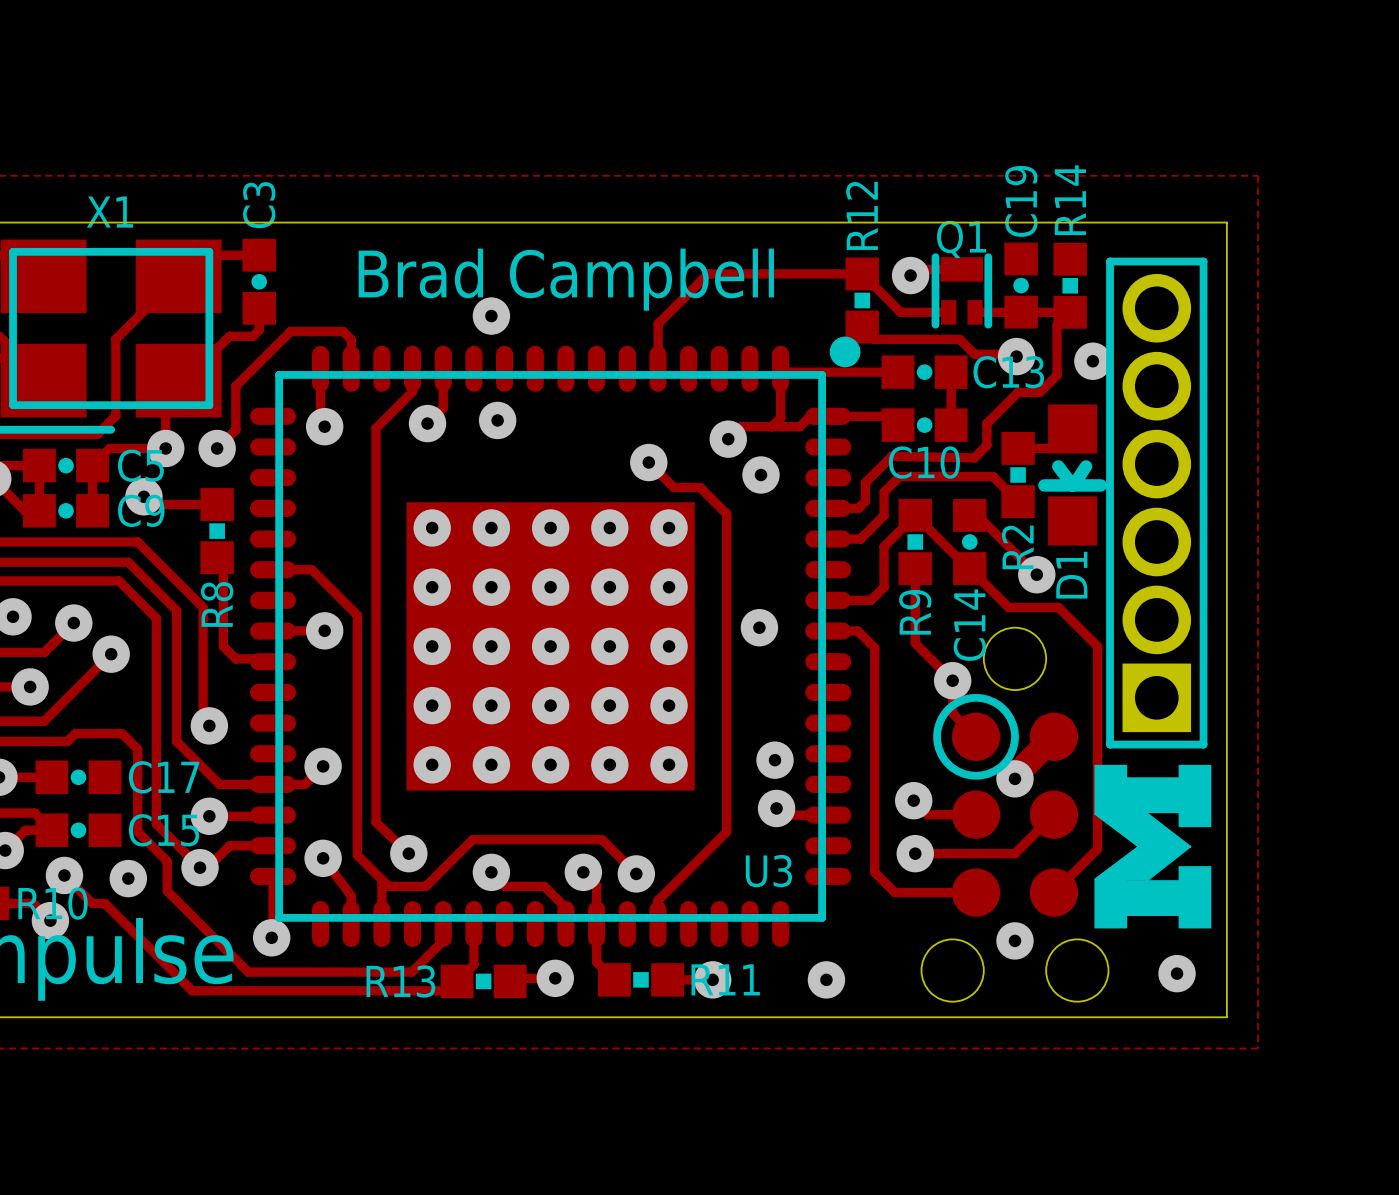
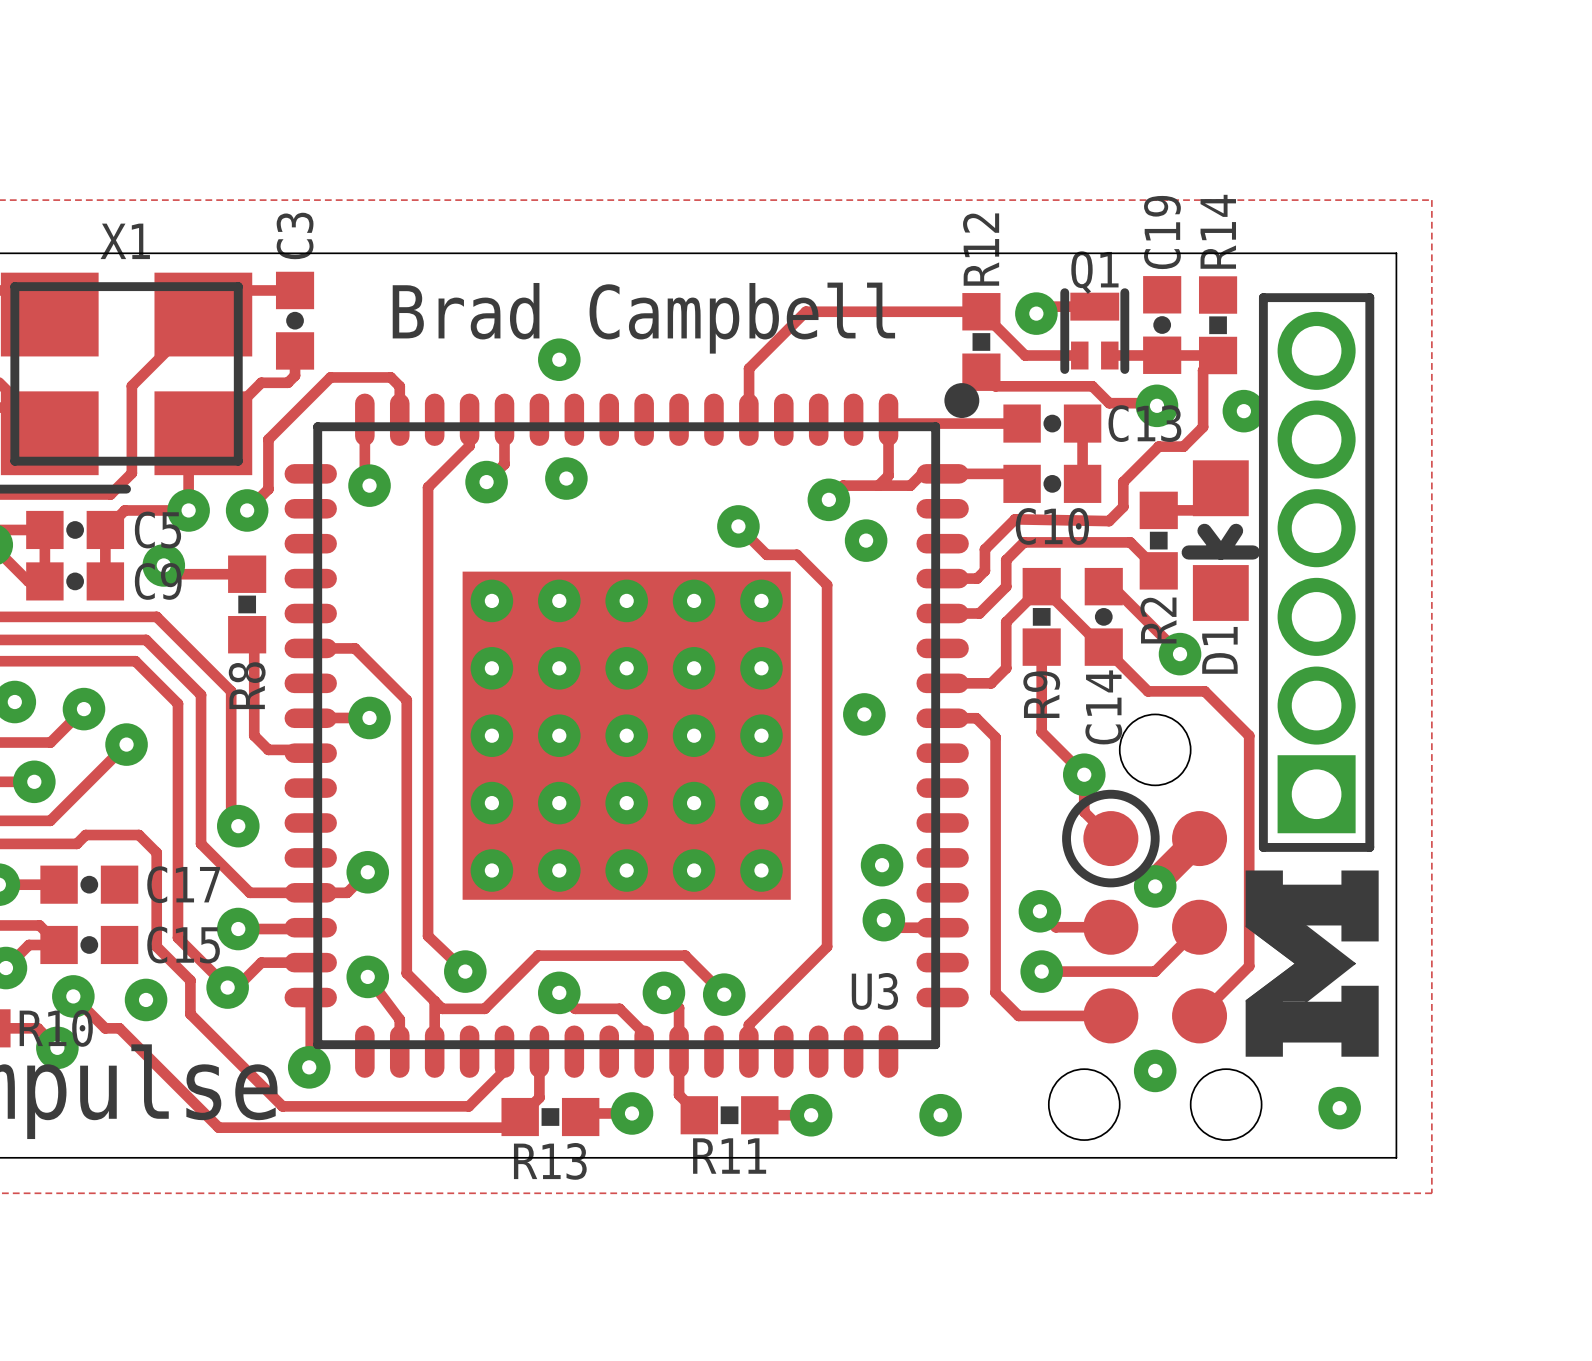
R11 name position: R11 (725, 979) -> R11 (729, 1156)
R13 name position: R13 (400, 981) -> R13 (550, 1161)

